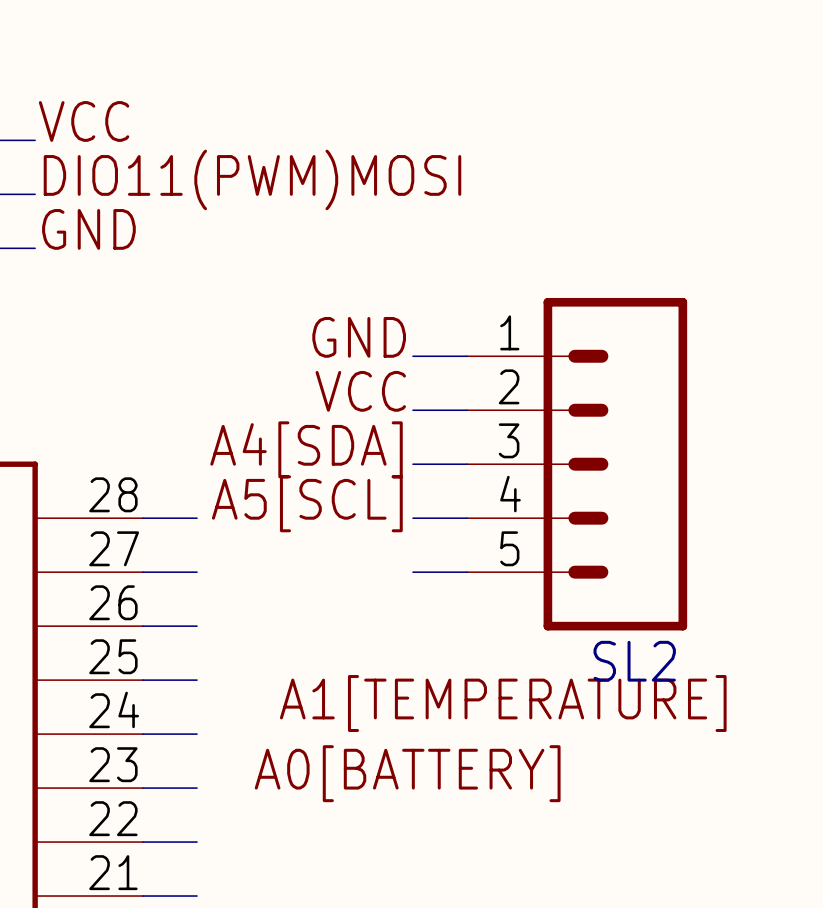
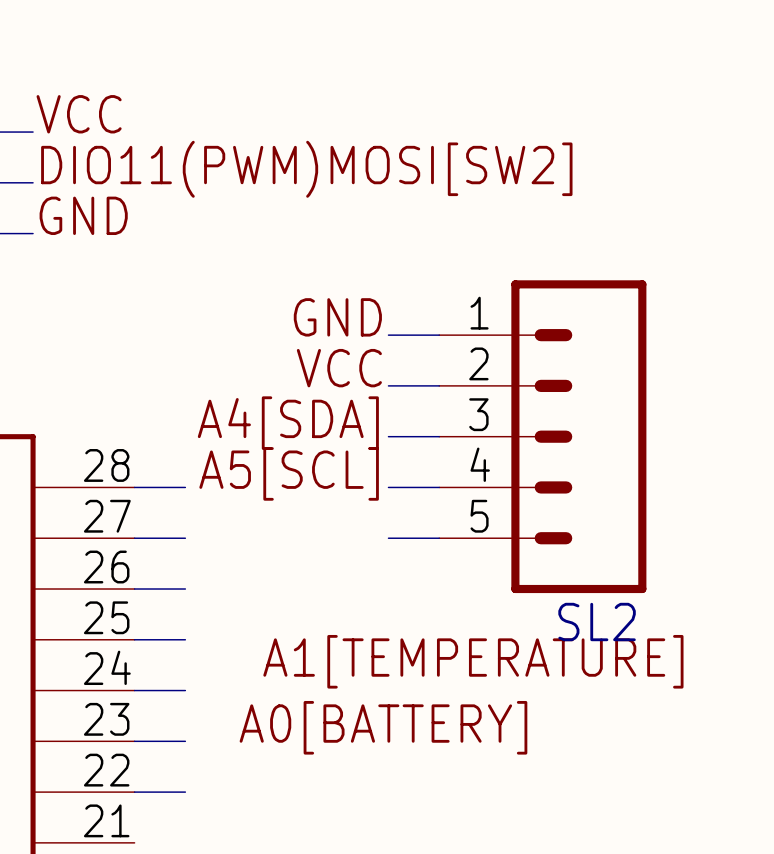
label: DIO11(PWM)MOSI (252, 179) -> DIO11(PWM)MOSI[SW2] (306, 169)
wire: (143, 896) (197, 896) -> none

